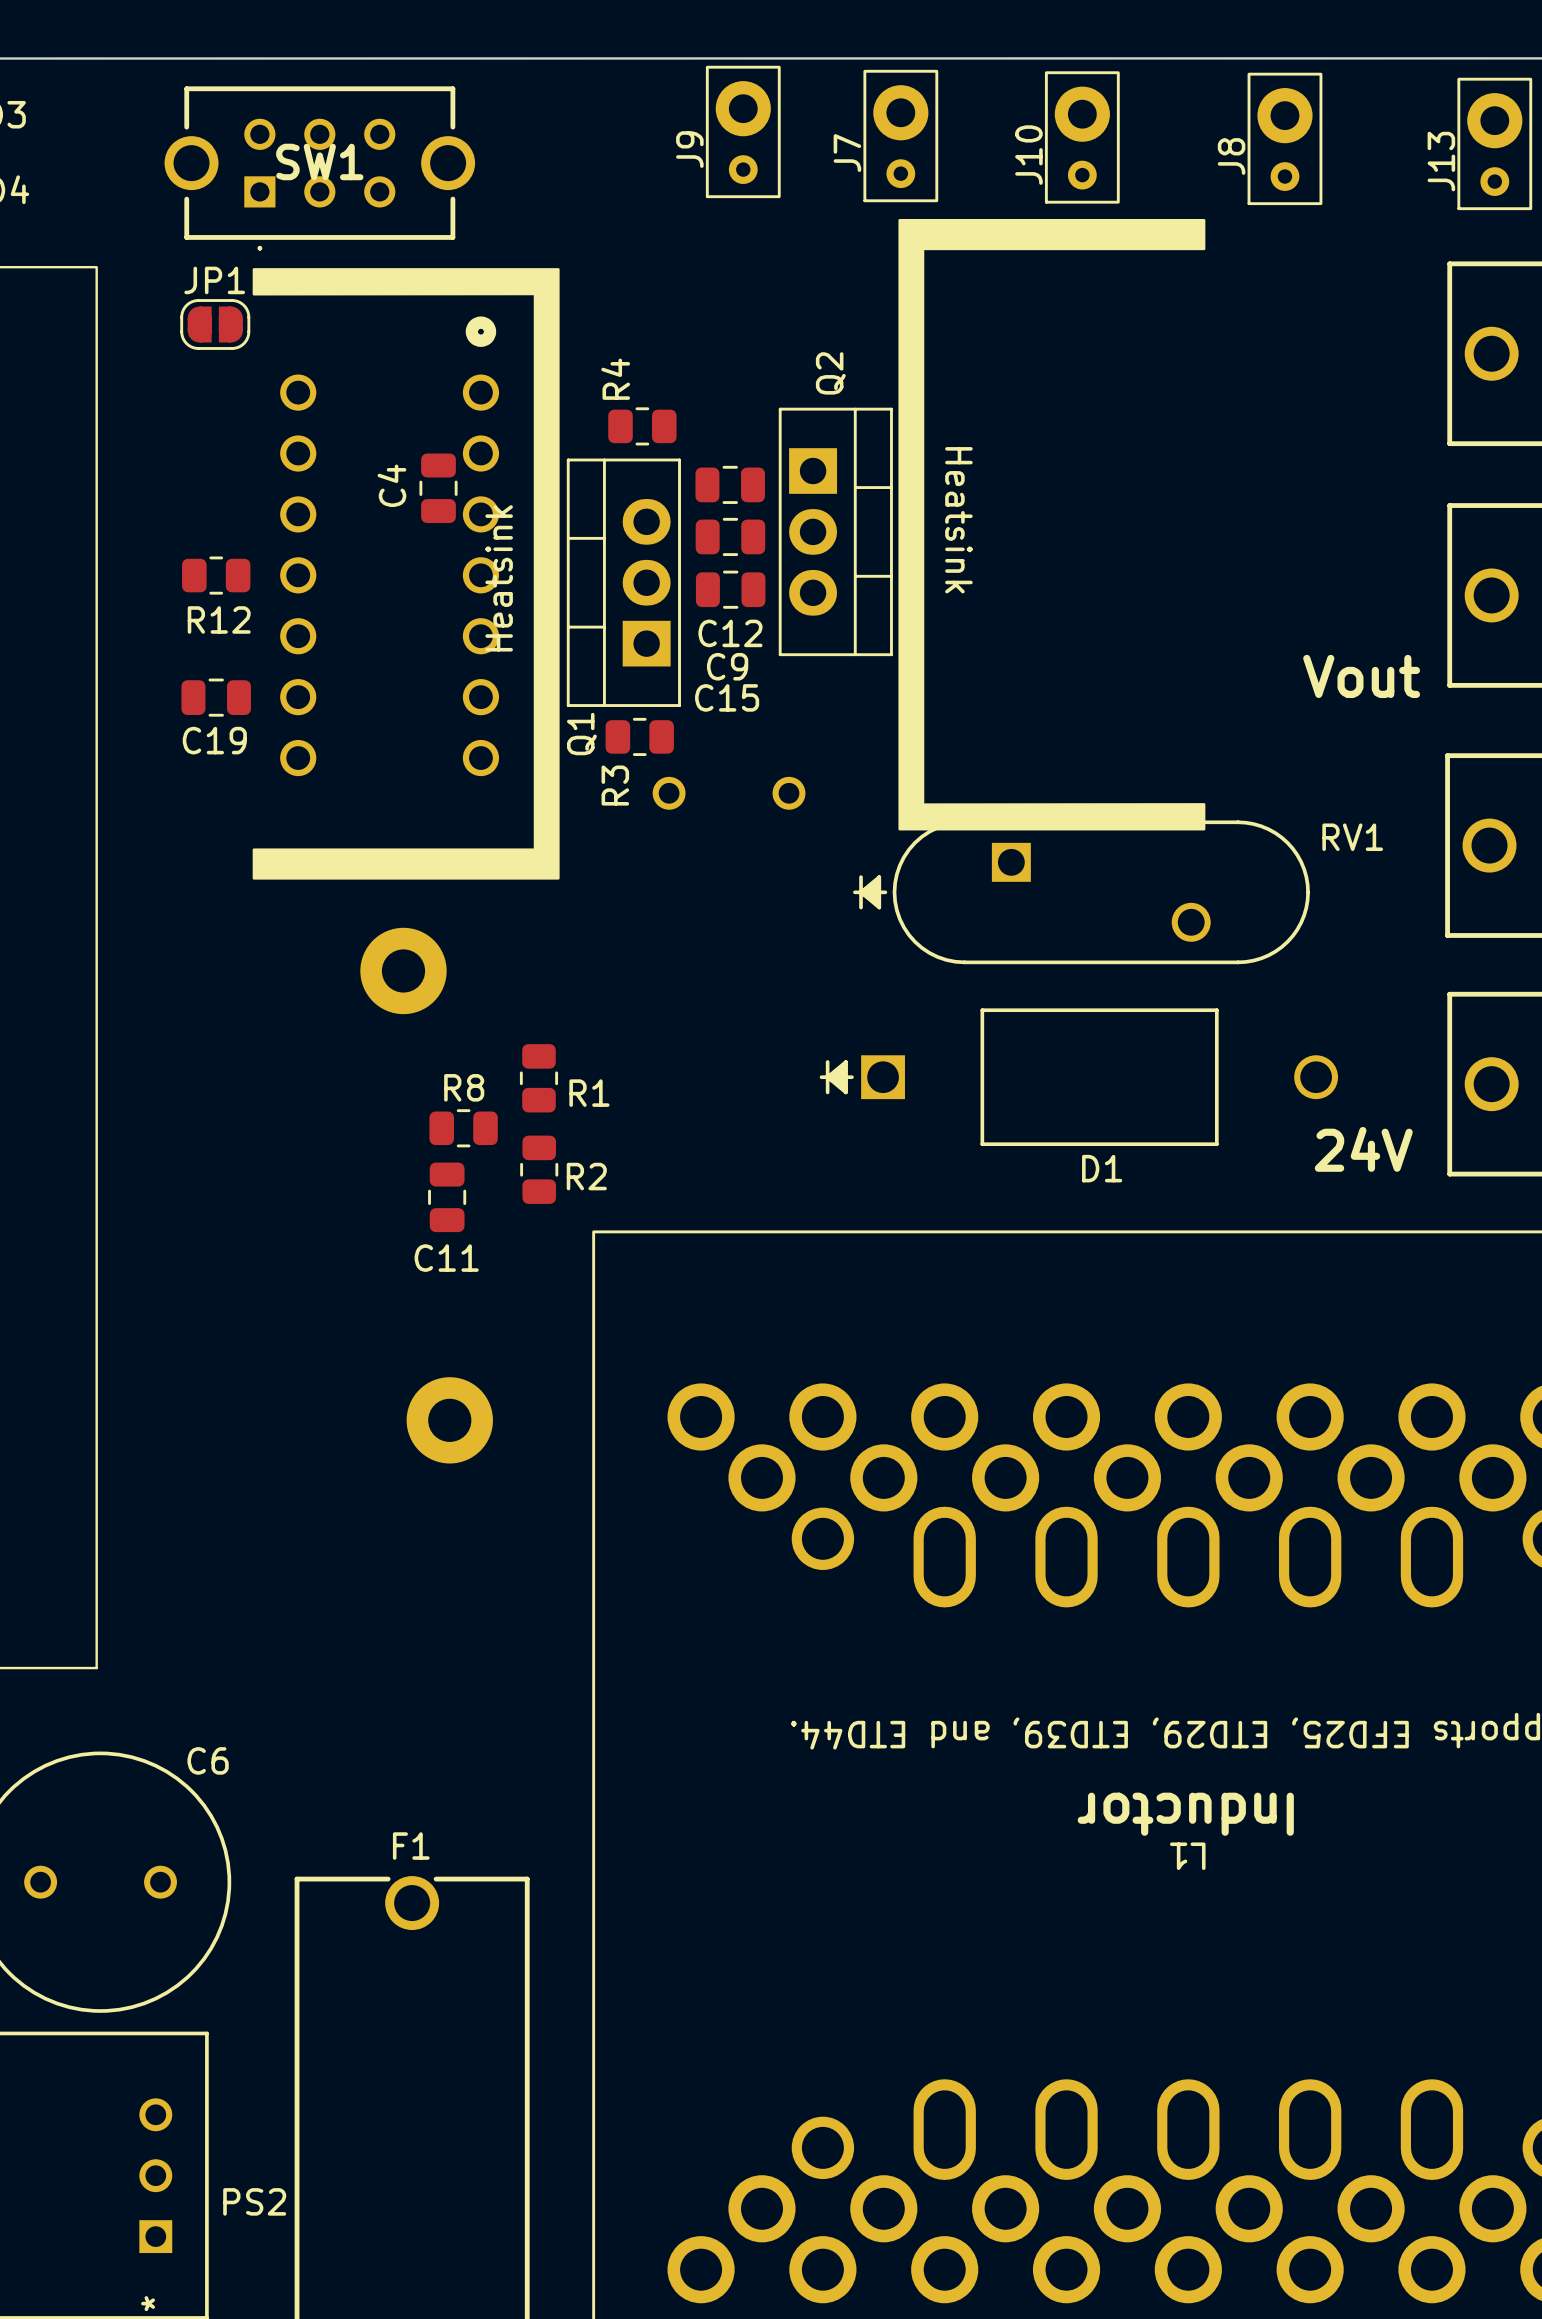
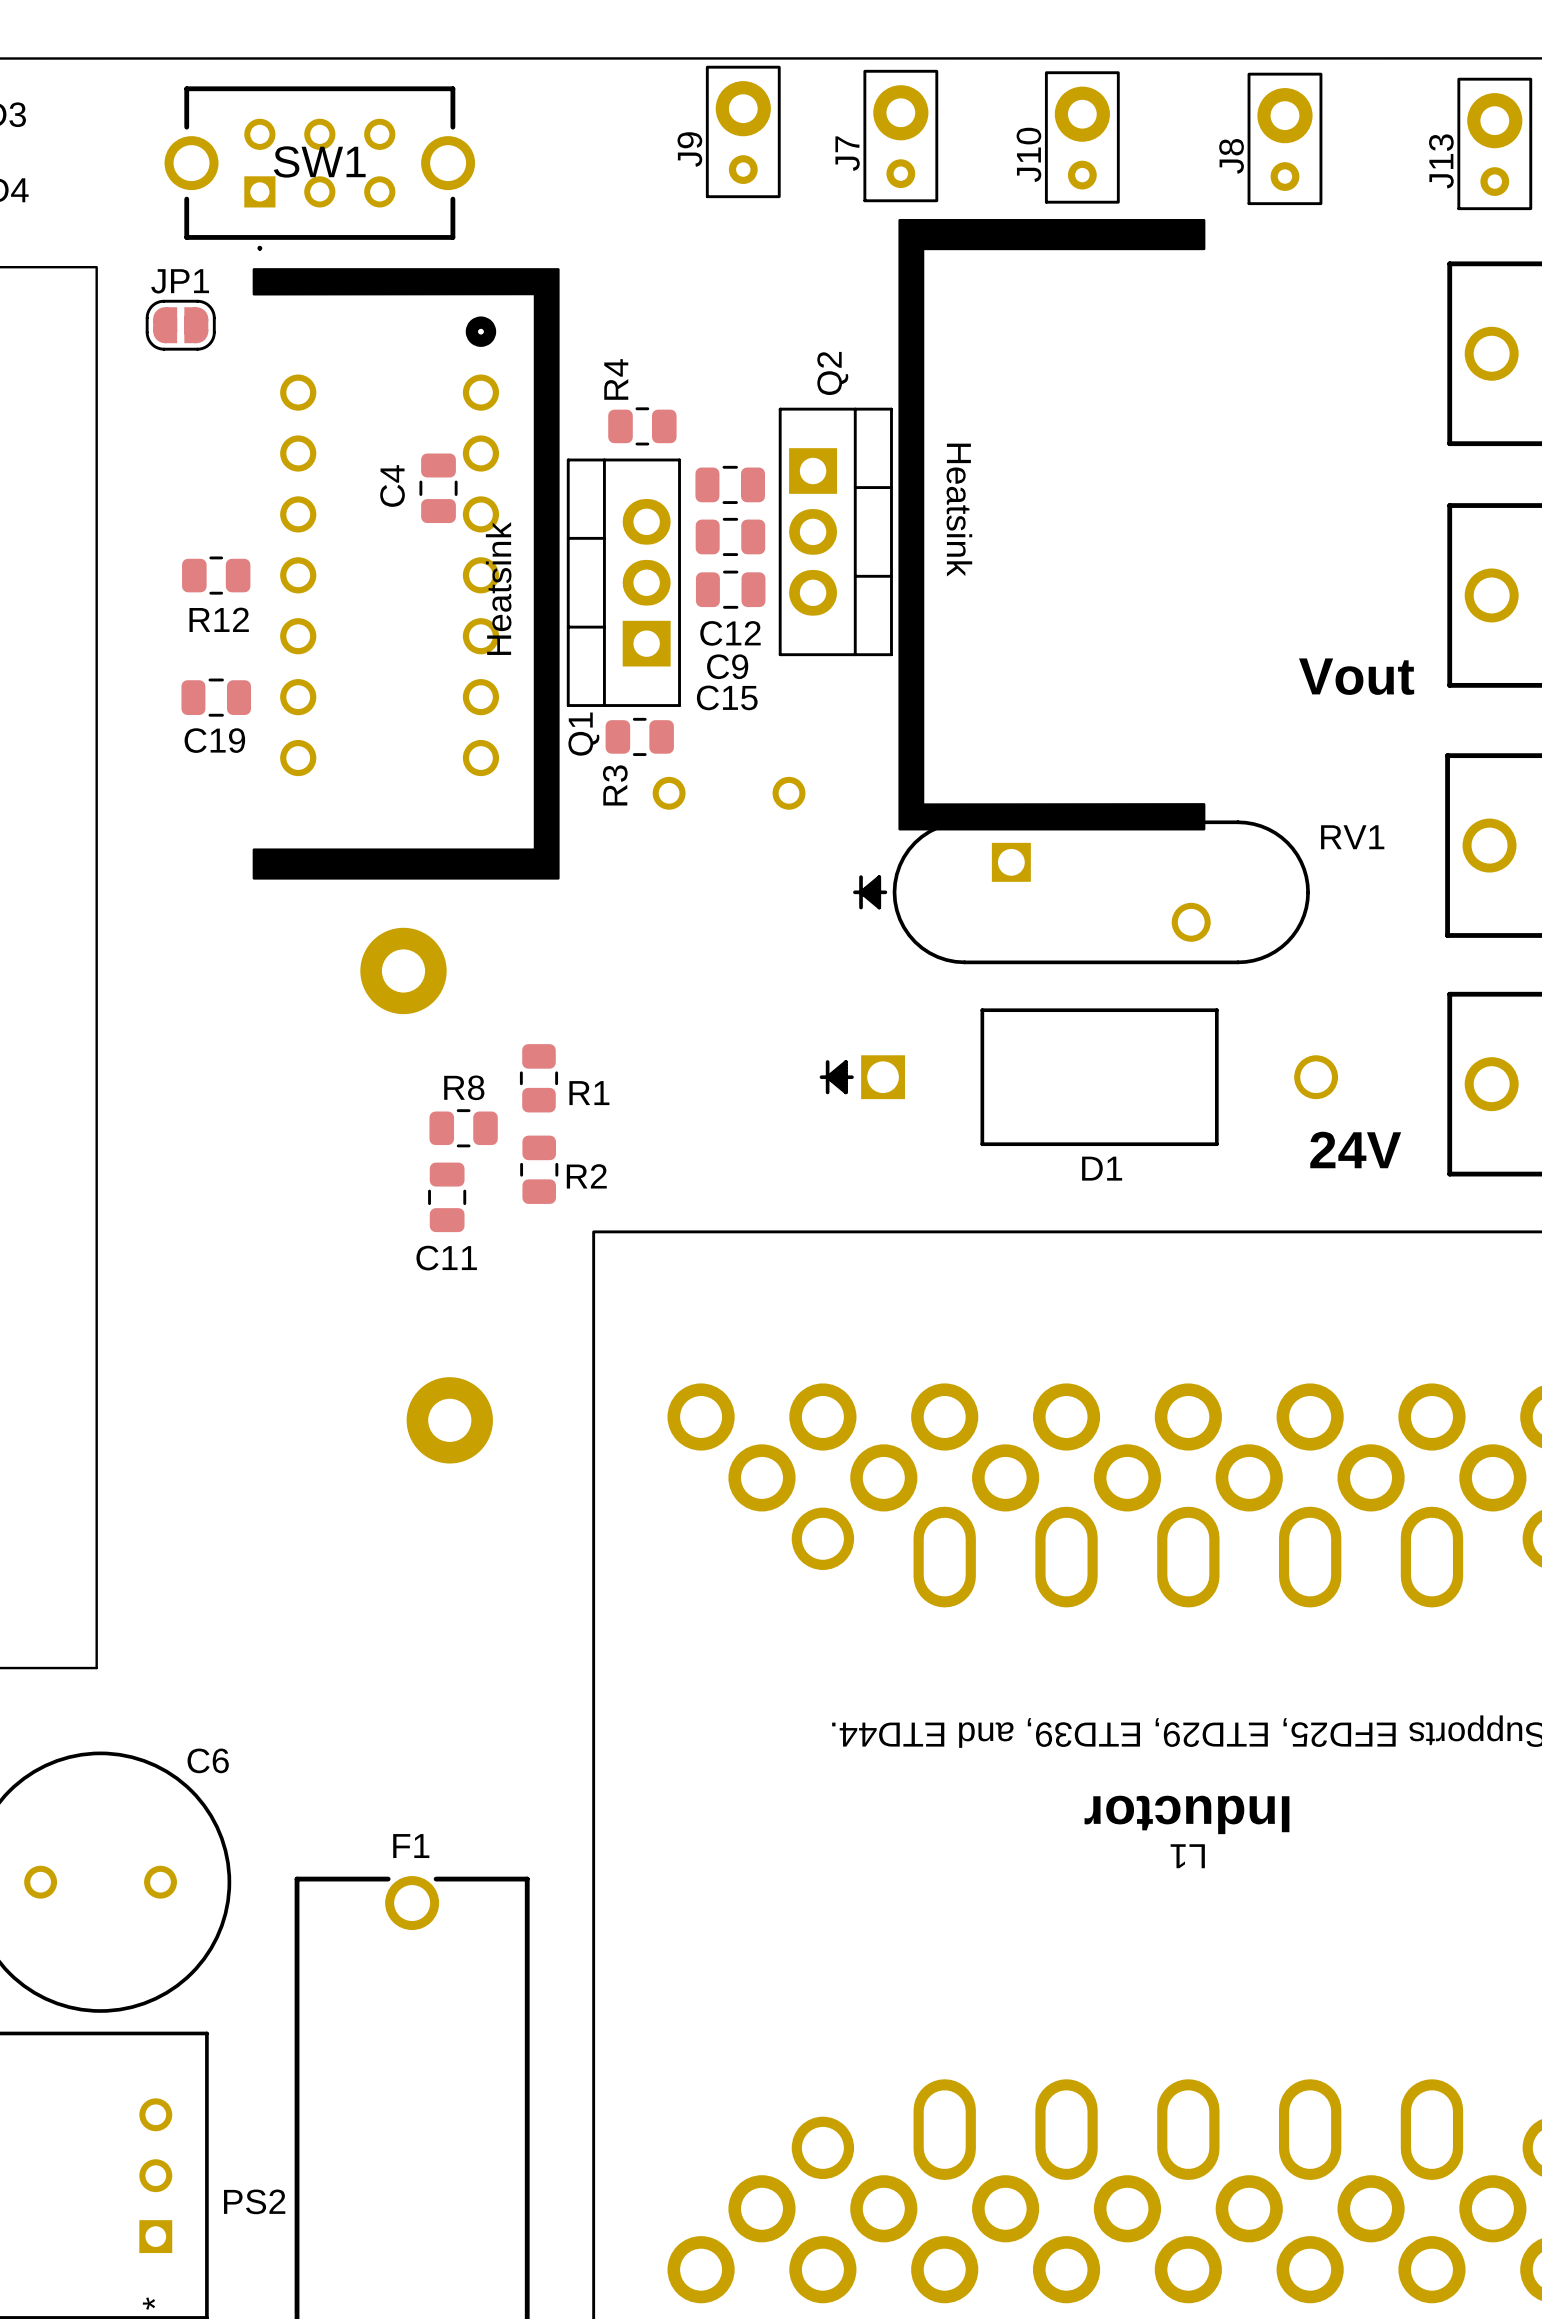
JP1 position: (215, 324) -> (180, 325)

